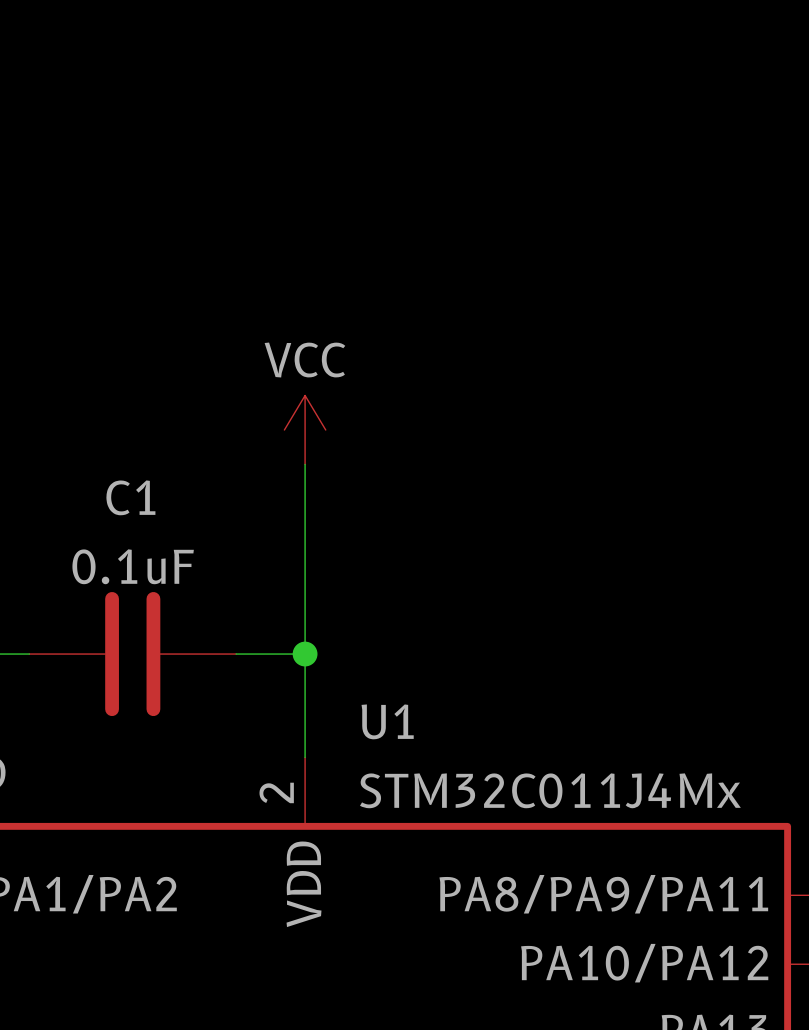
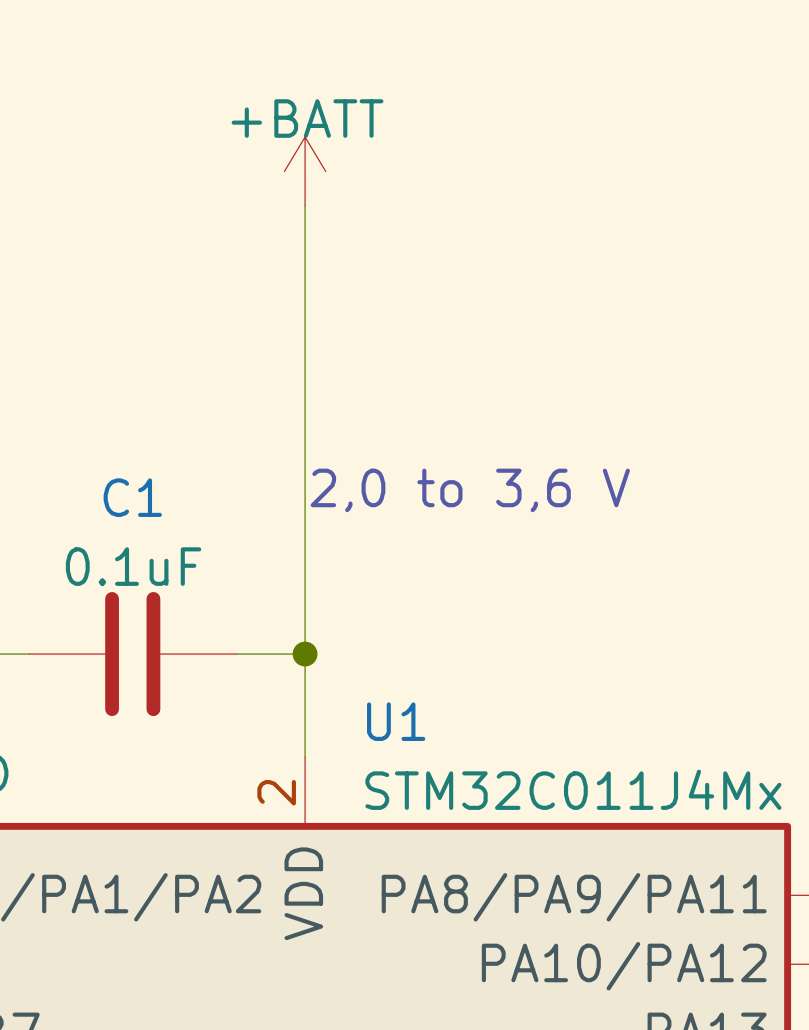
power symbol: none -> +BATT (305, 171)
wire: none -> (305, 205) (305, 464)
power symbol: VCC (305, 430) -> none
text: none -> 2,0 to 3,6 V (470, 490)

